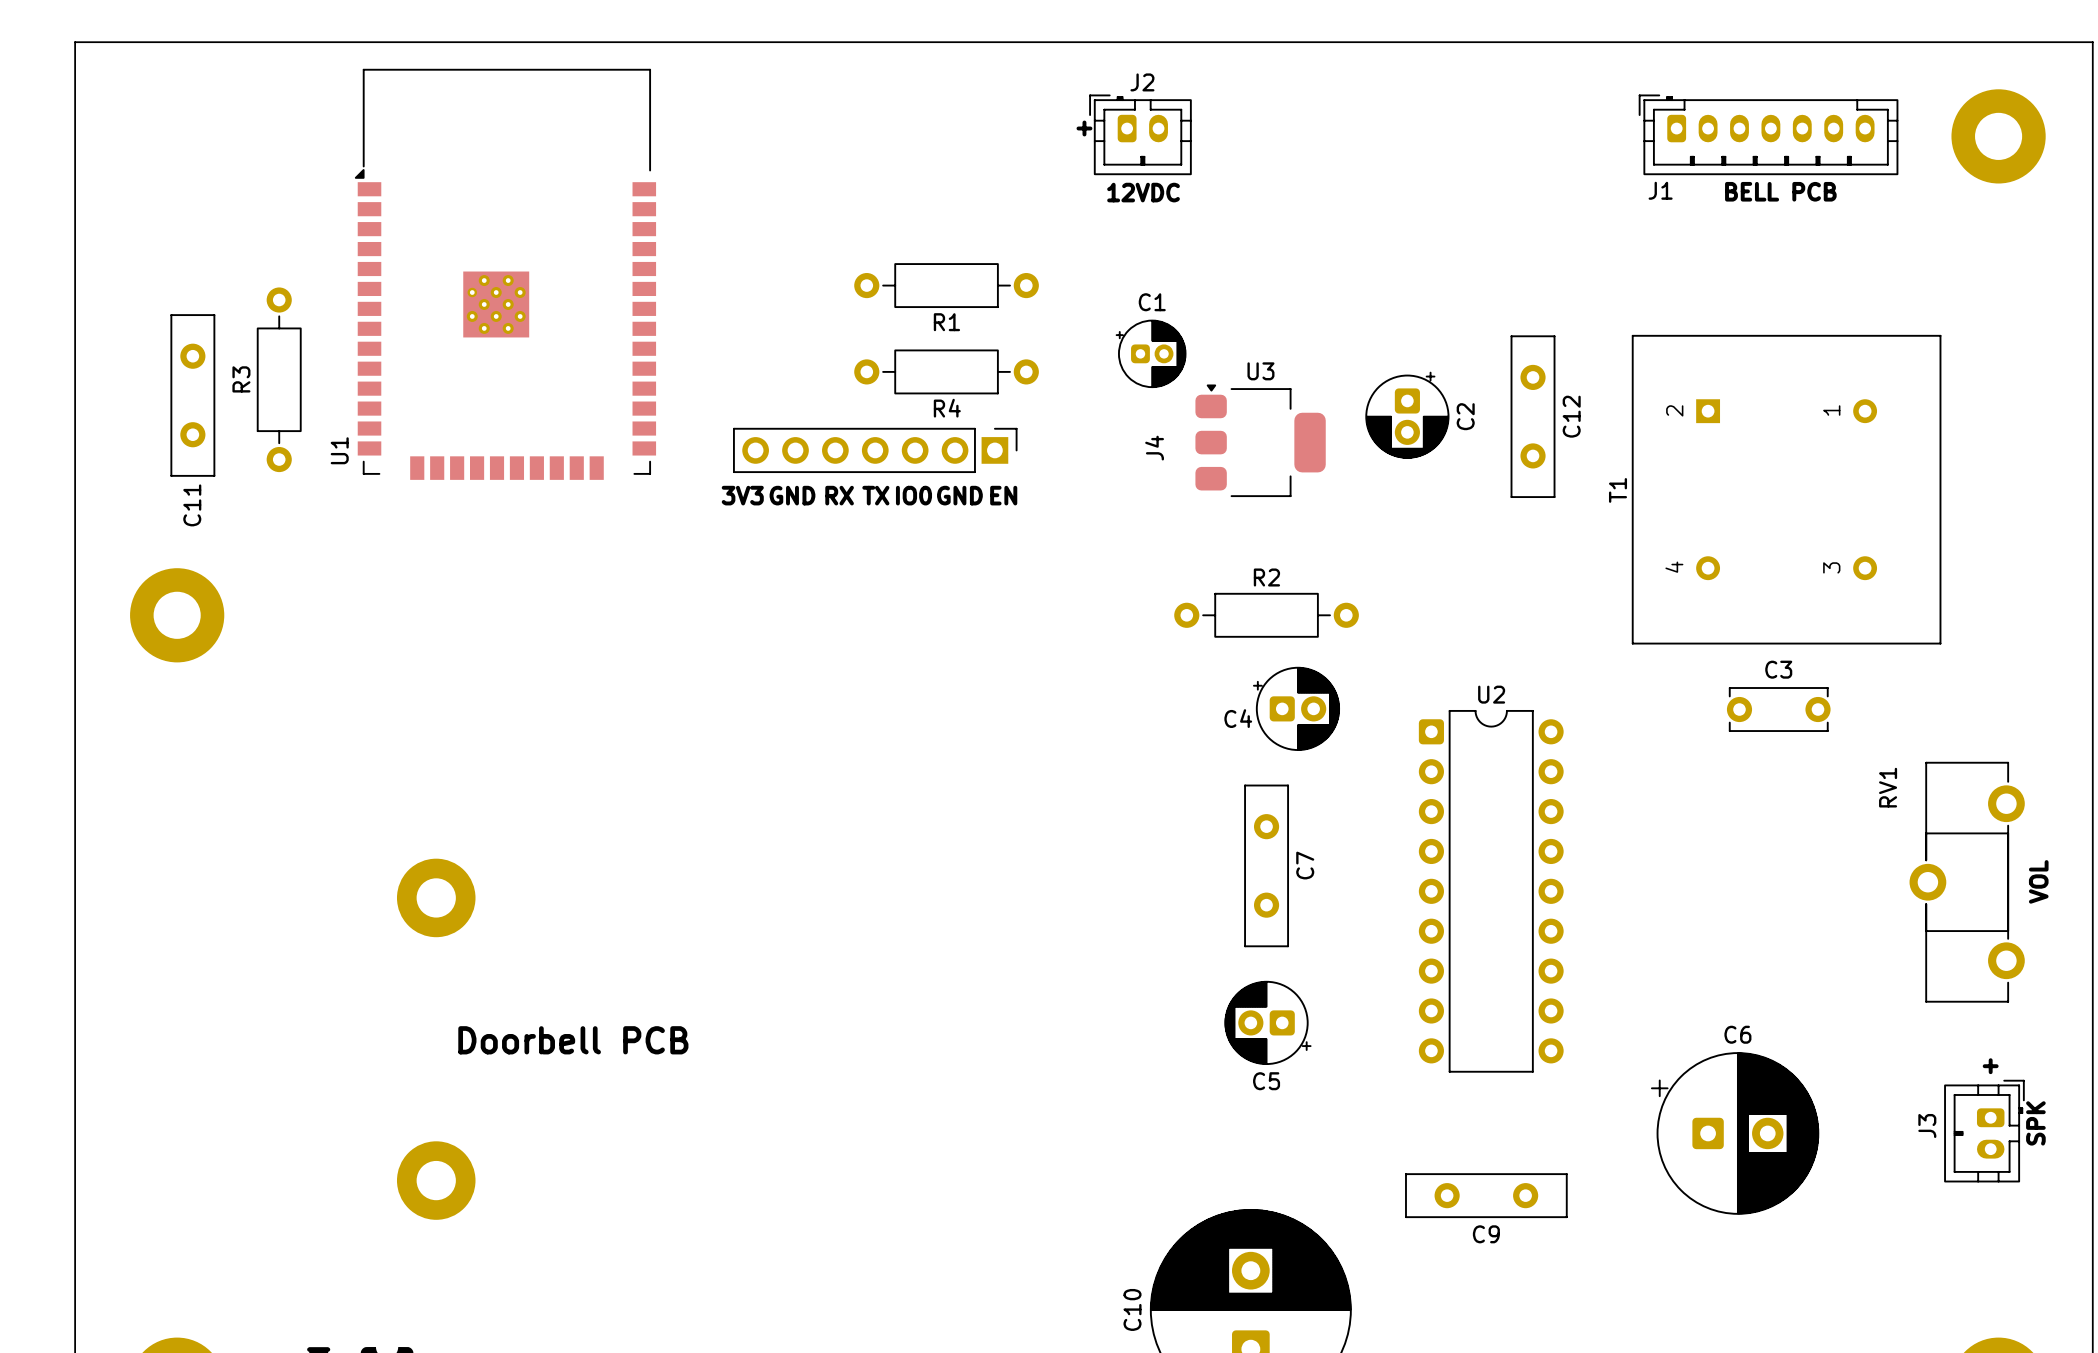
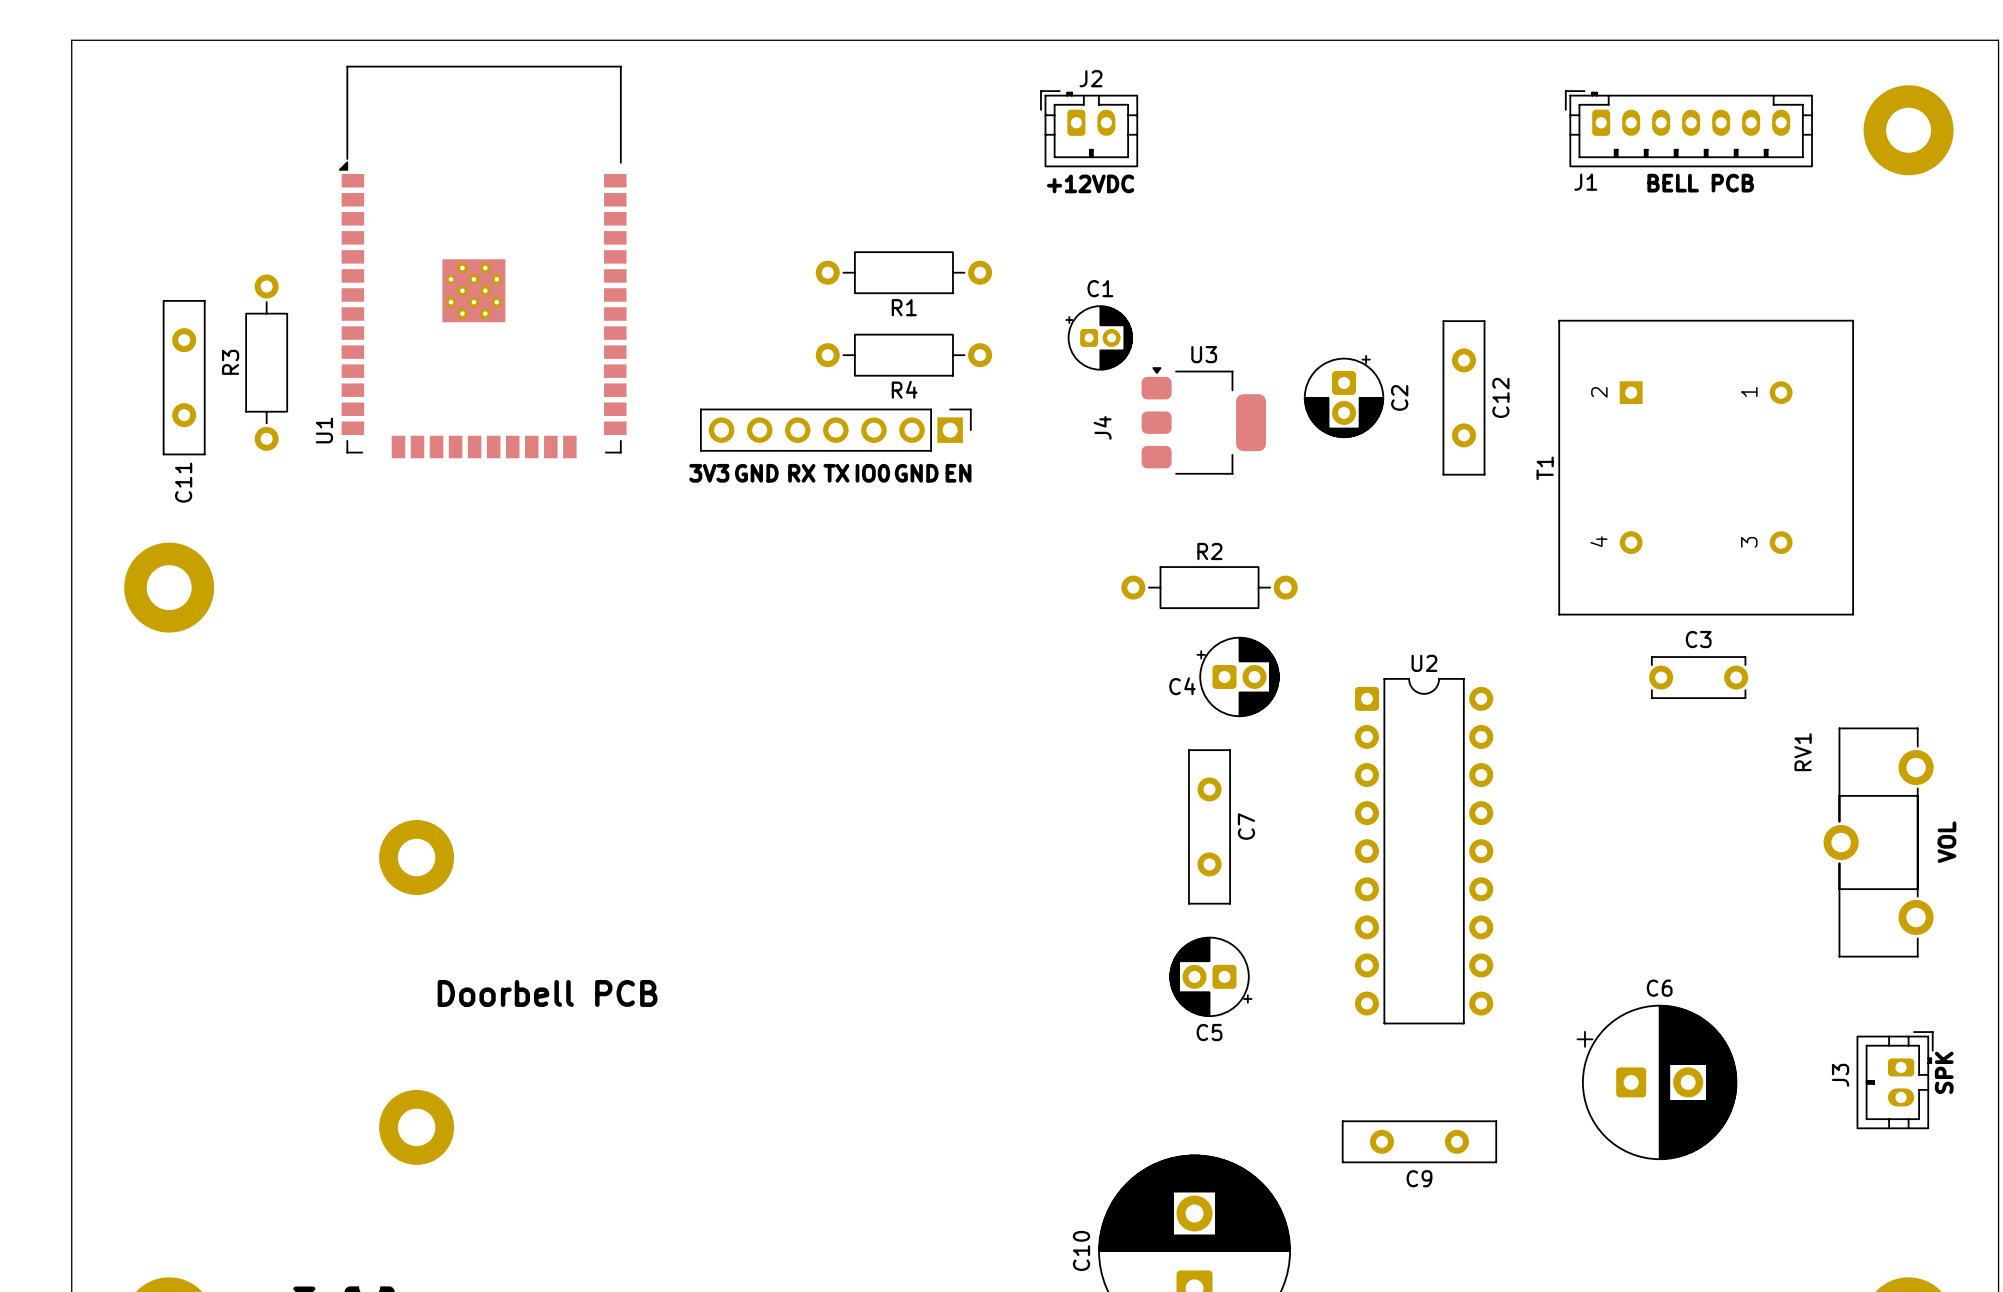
text: + (1084, 128) -> none
text: 12VDC (1143, 192) -> +12VDC (1090, 183)
text: + (1990, 1066) -> none

